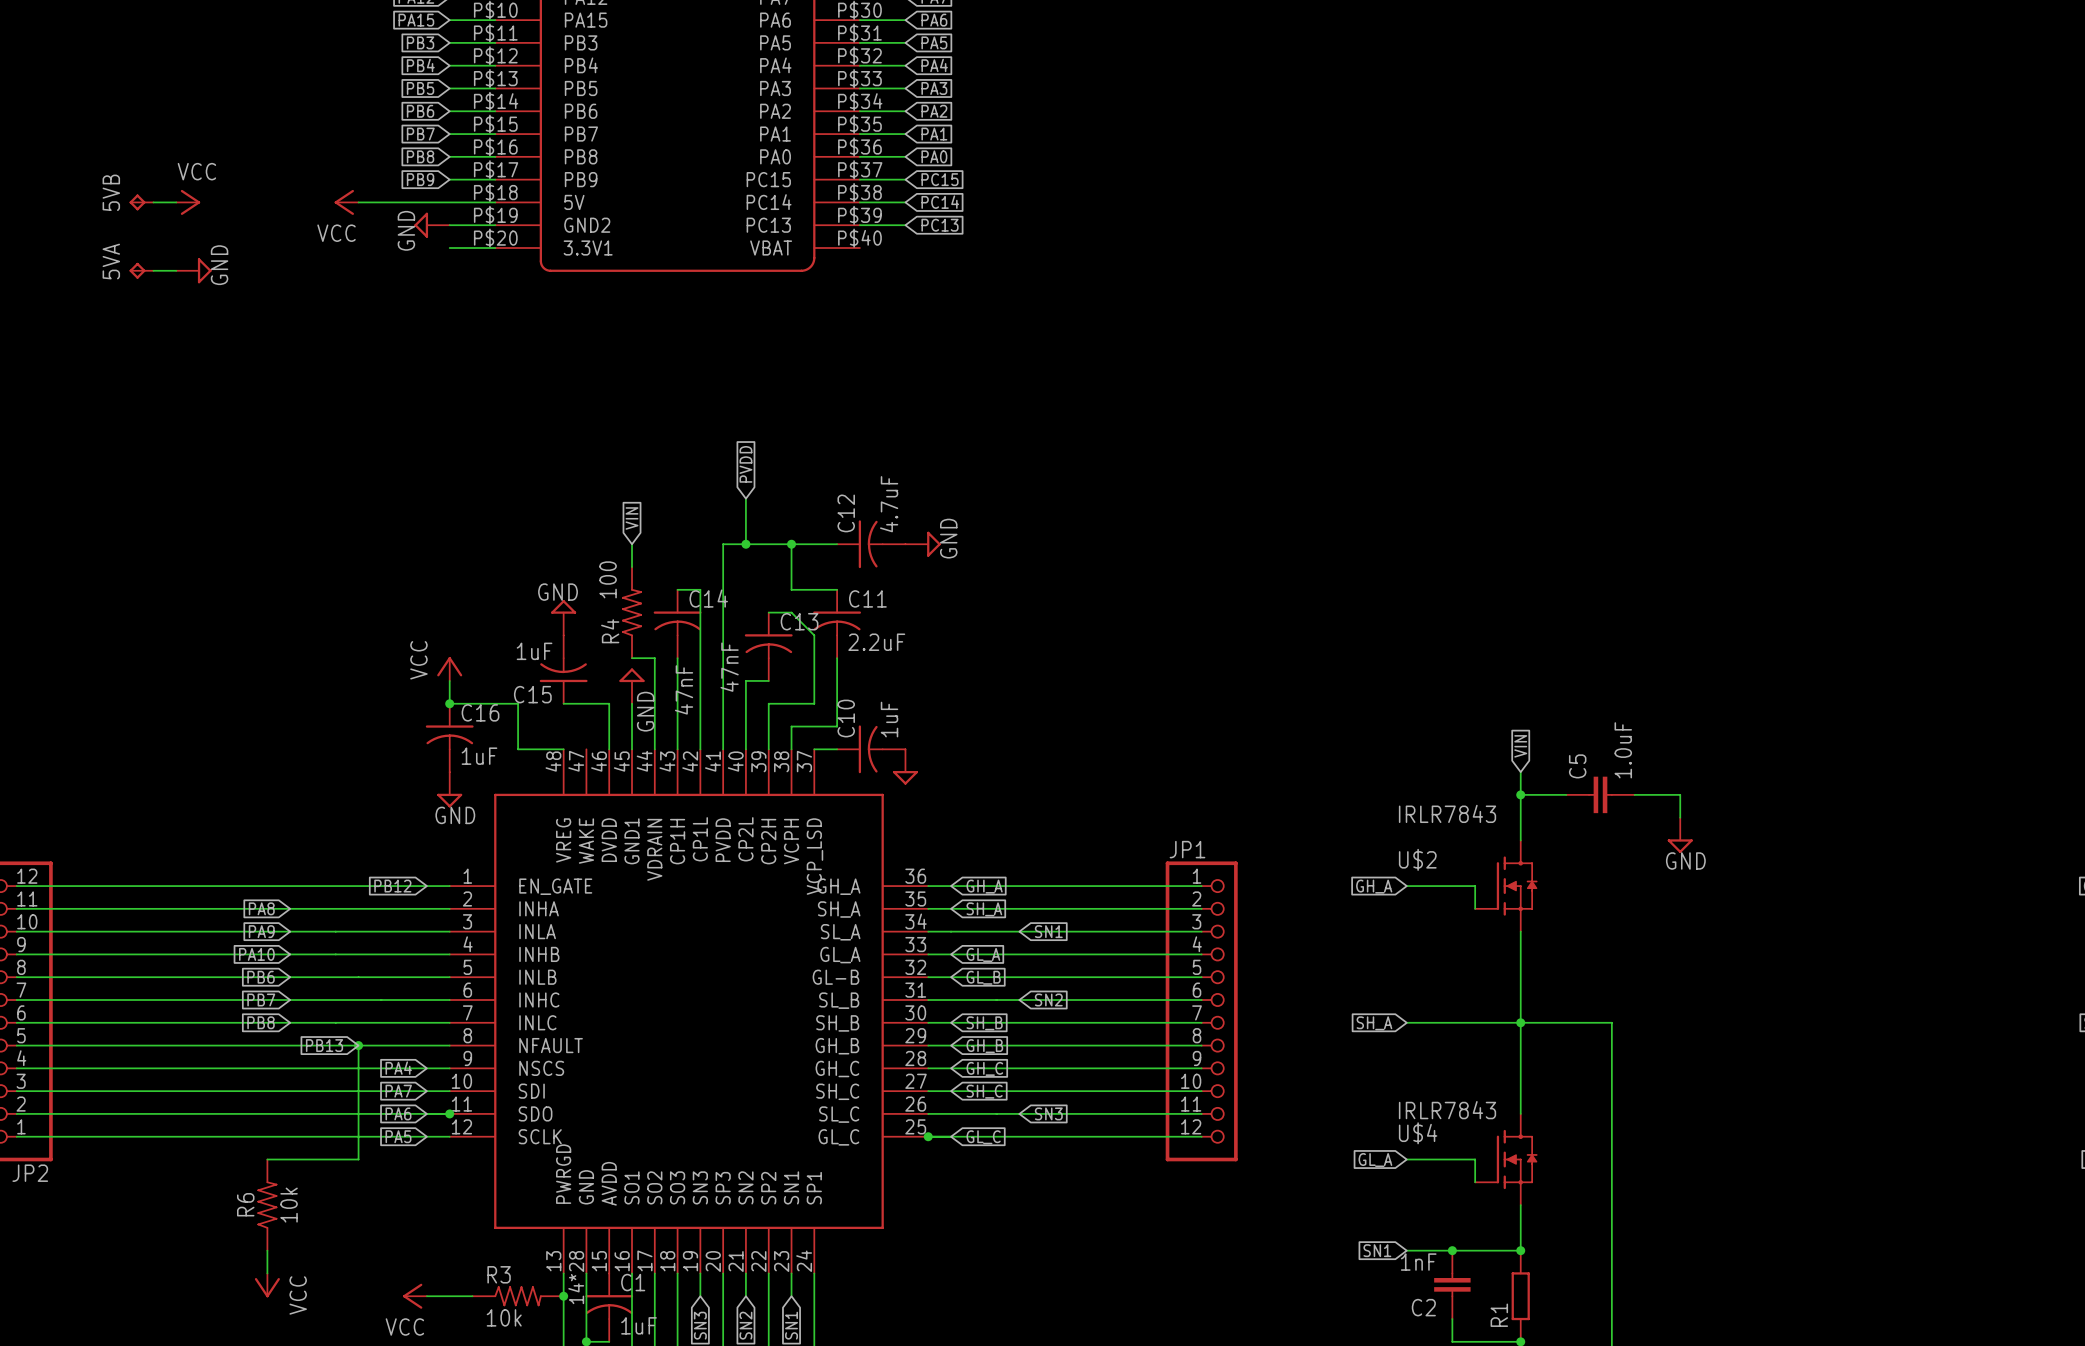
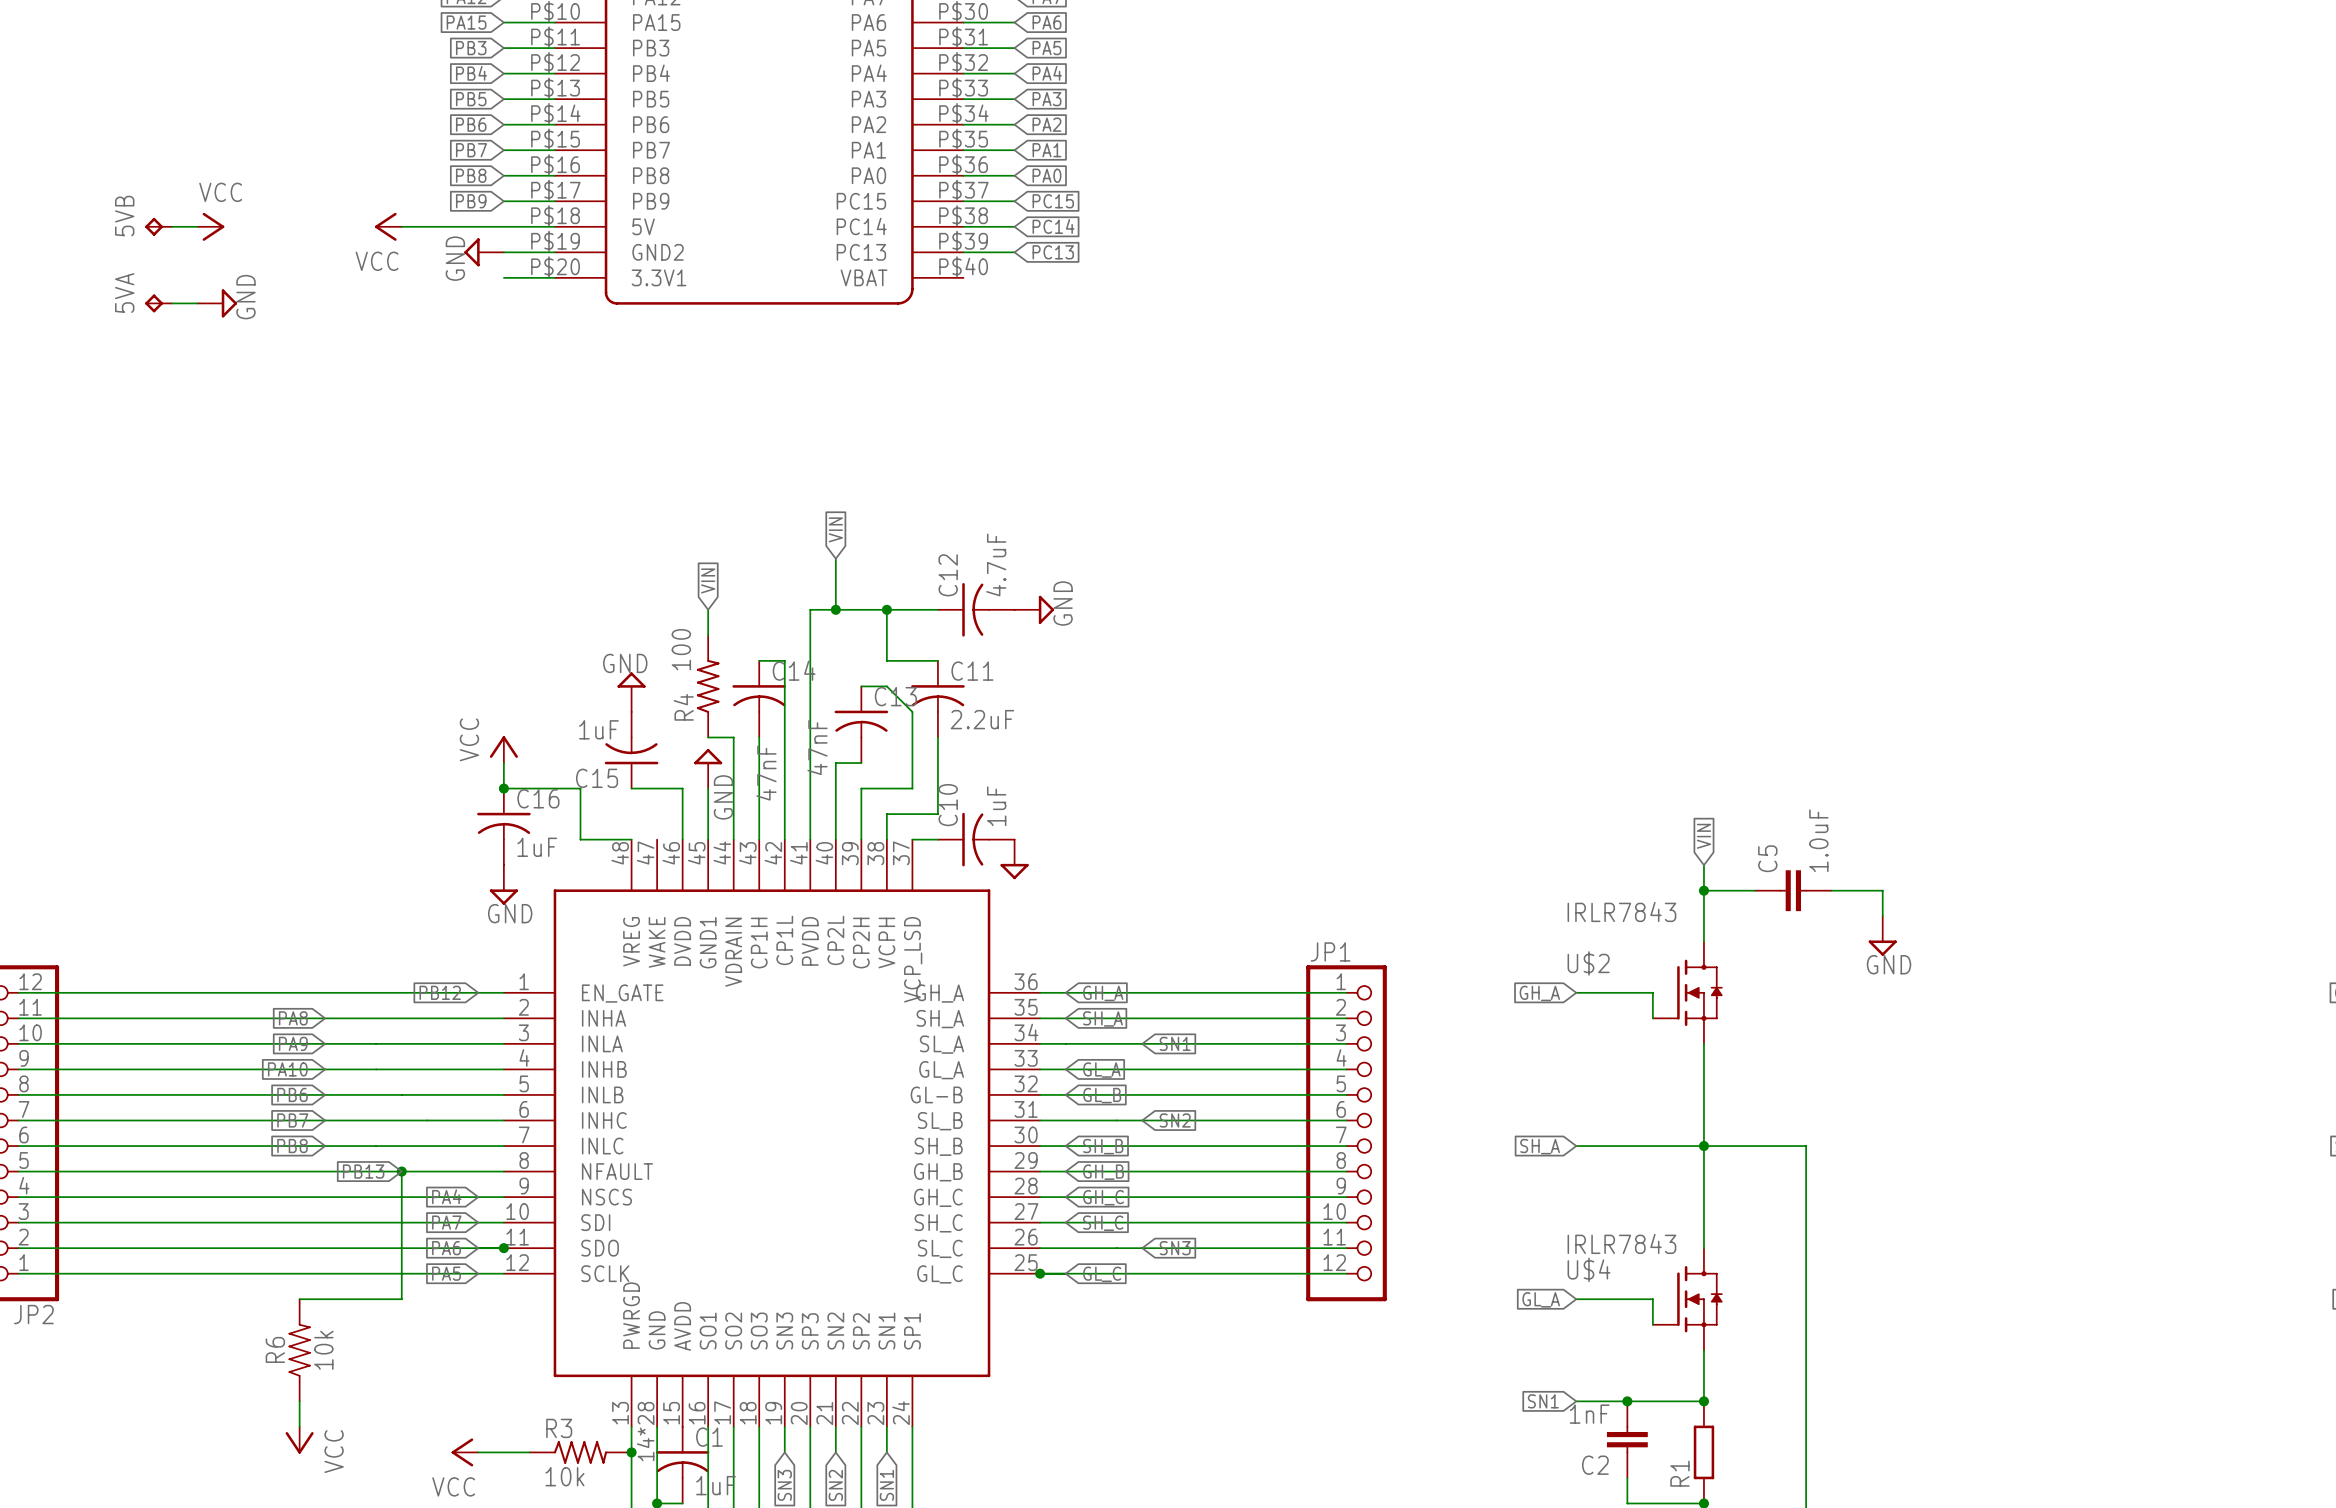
global label: PVDD (745, 464) -> VIN (835, 529)

